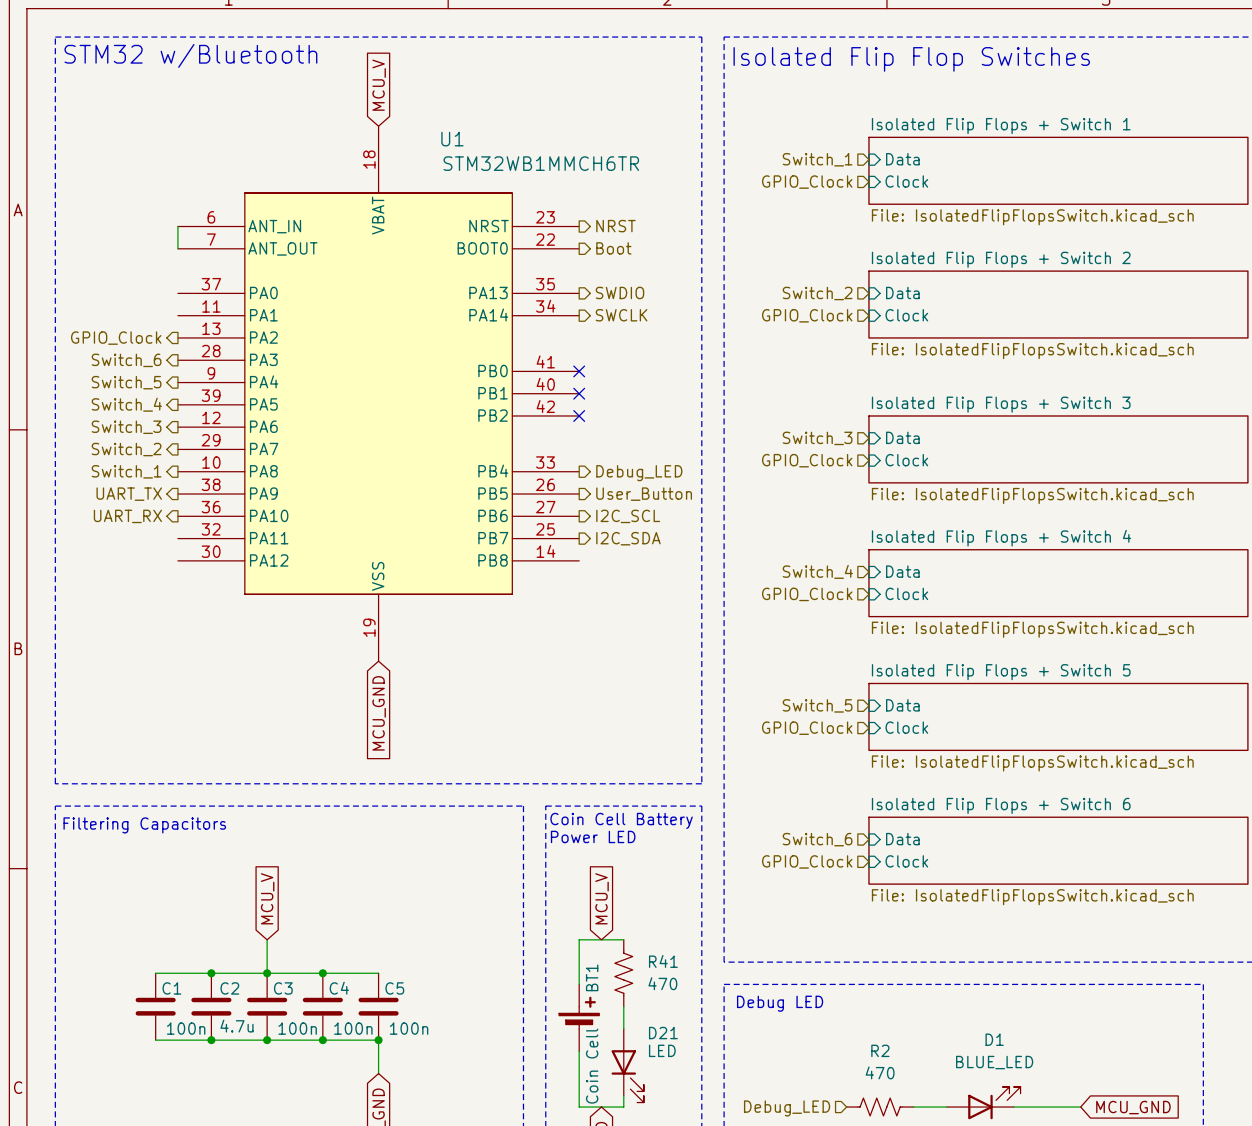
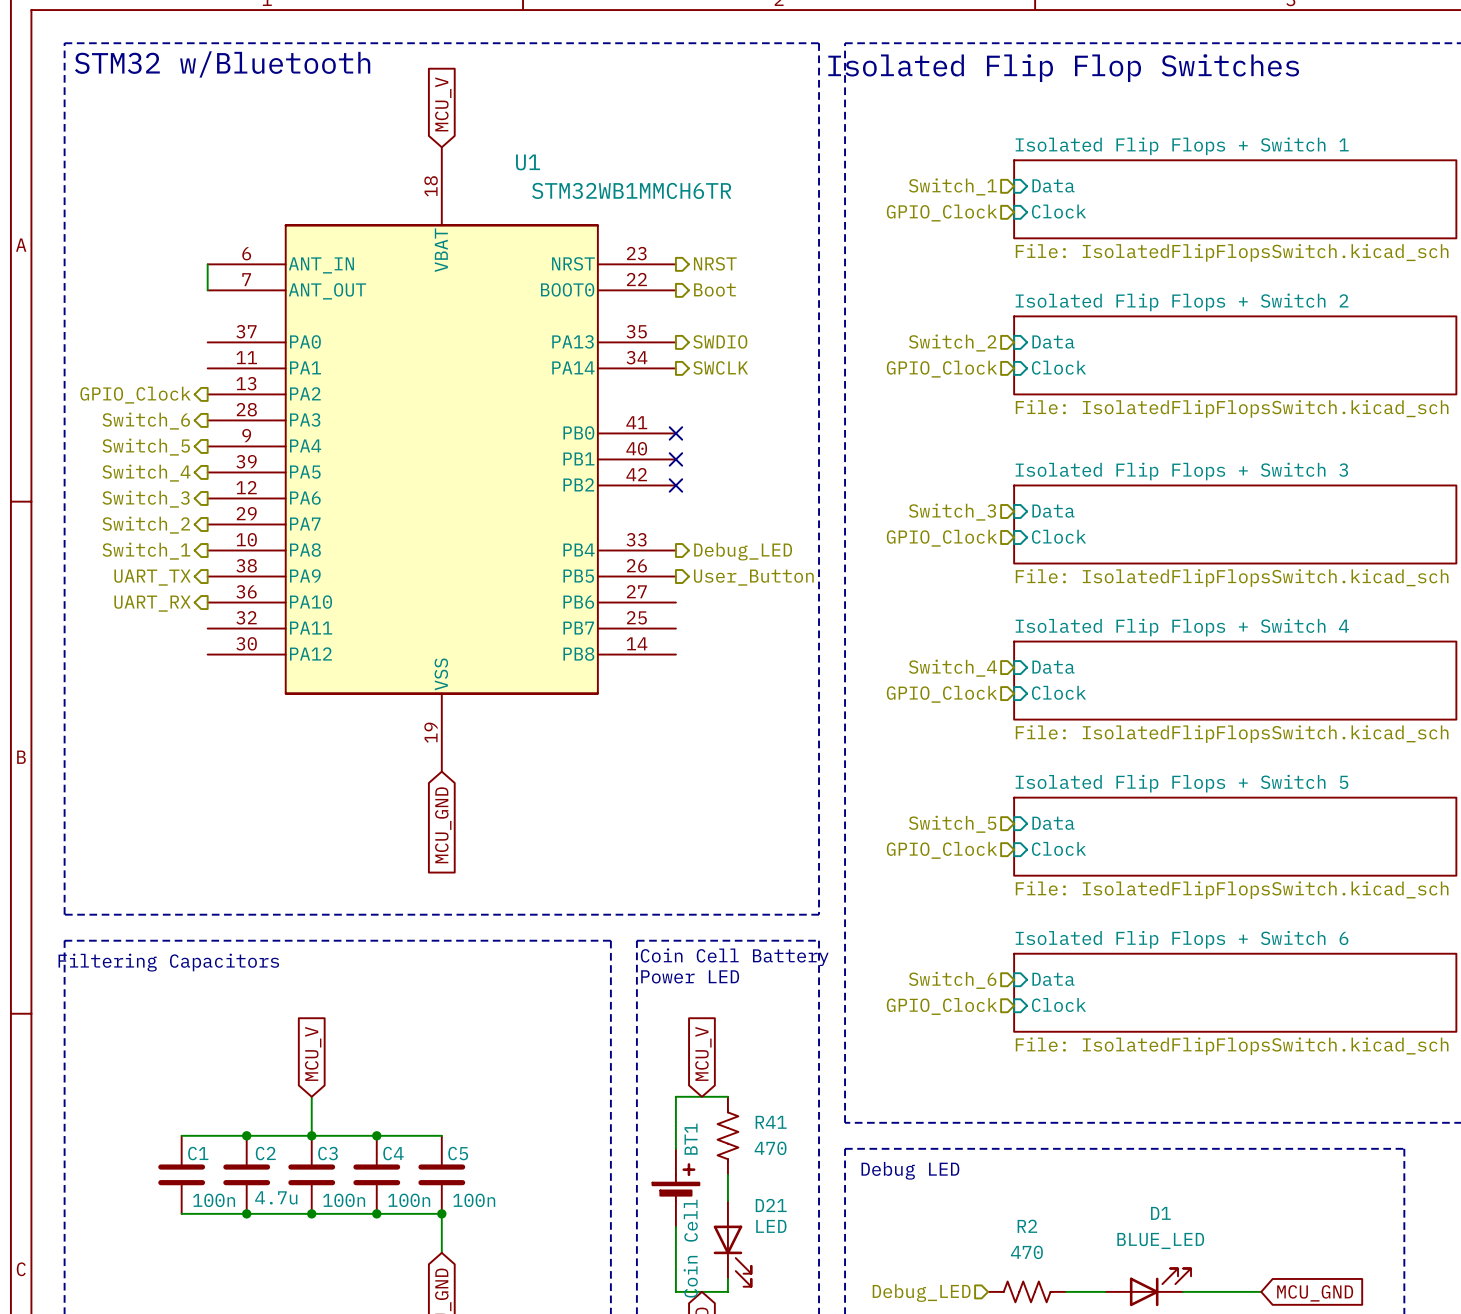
hierarchical label: I2C_SCL (628, 516) -> none
hierarchical label: I2C_SDA (628, 538) -> none

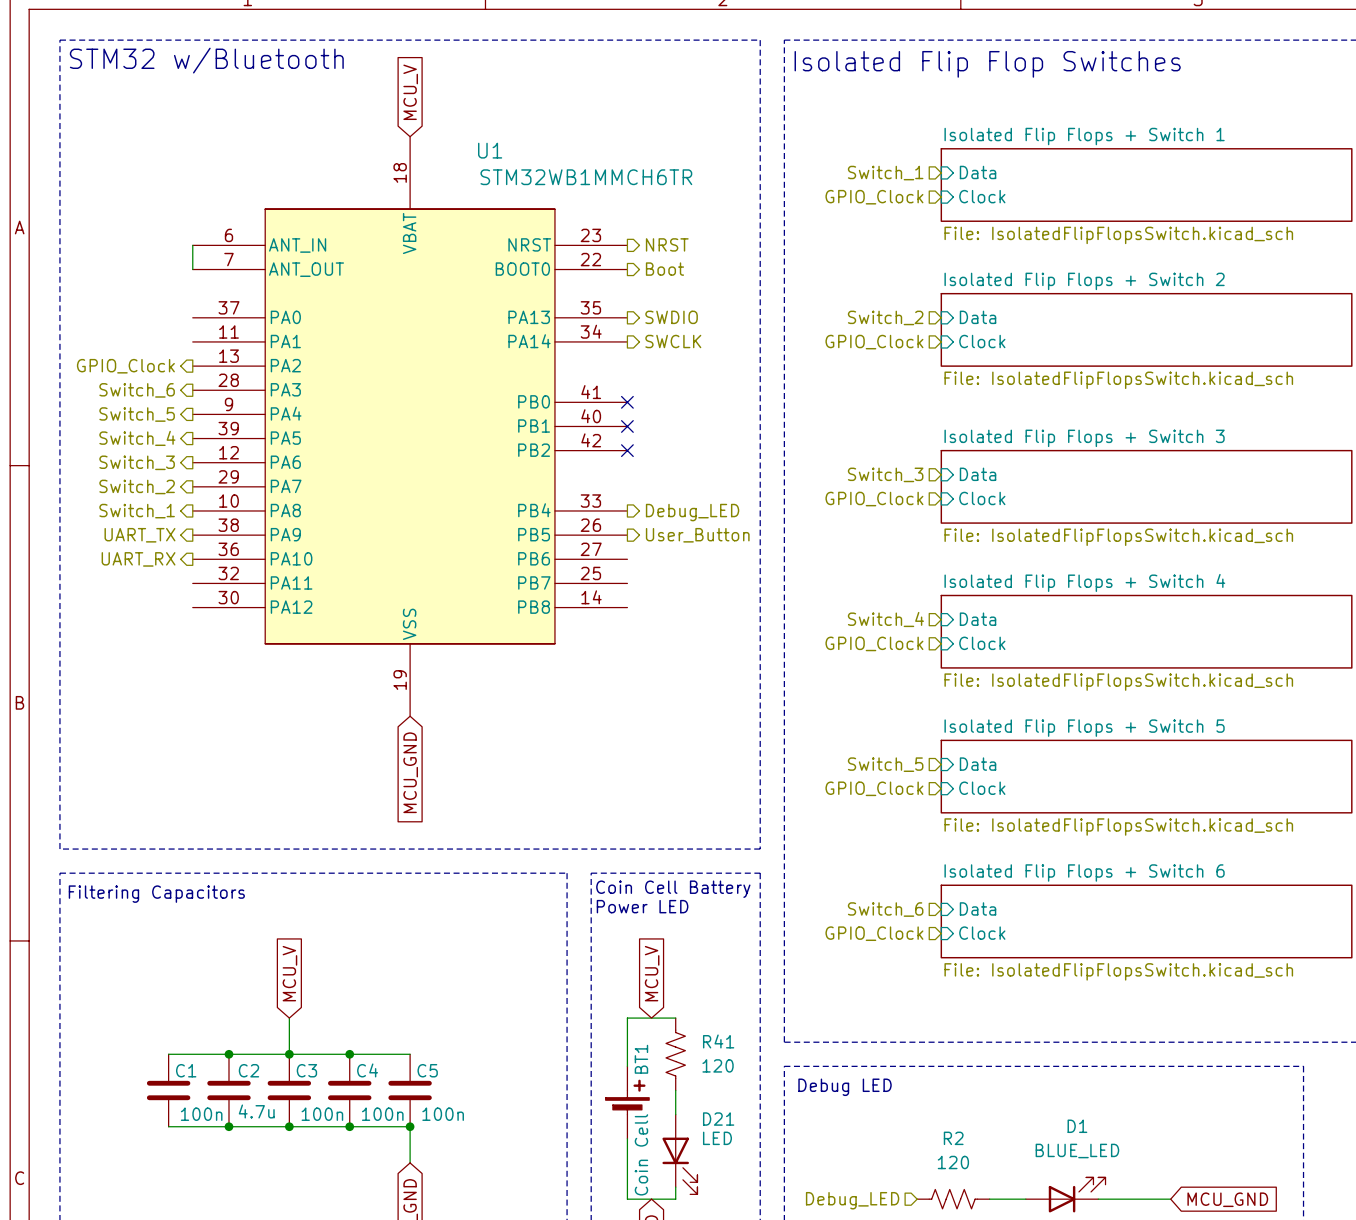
R41 value: 470 (770, 1148) -> 120 (718, 1065)
R2 value: 470 (1026, 1252) -> 120 (953, 1162)

